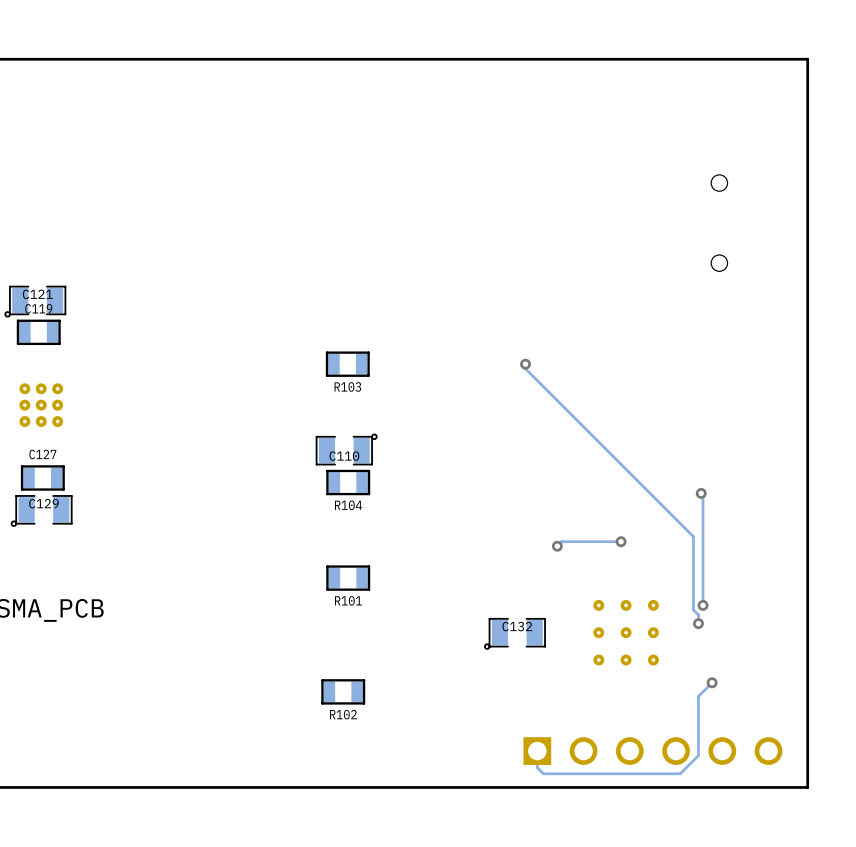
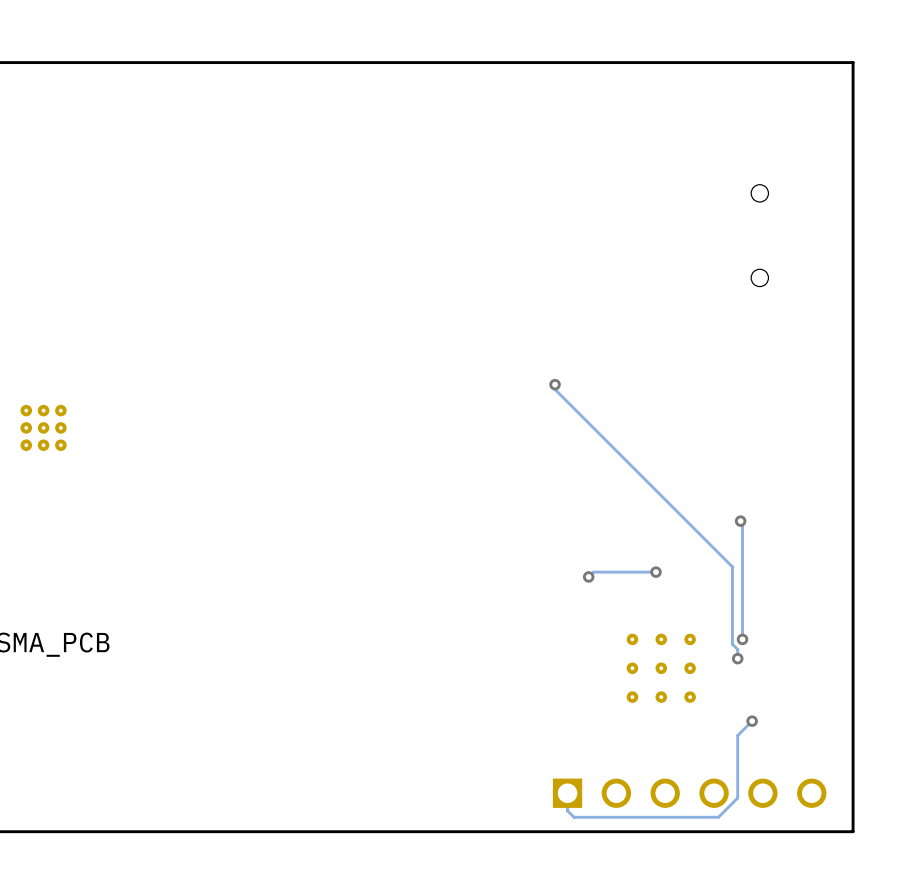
C121: (35, 301) -> none
C119: (38, 332) -> none
R103: (347, 364) -> none
C110: (346, 449) -> none
C127: (42, 477) -> none
R104: (348, 482) -> none
C129: (41, 510) -> none
R101: (348, 578) -> none
C132: (514, 633) -> none
R102: (343, 691) -> none

